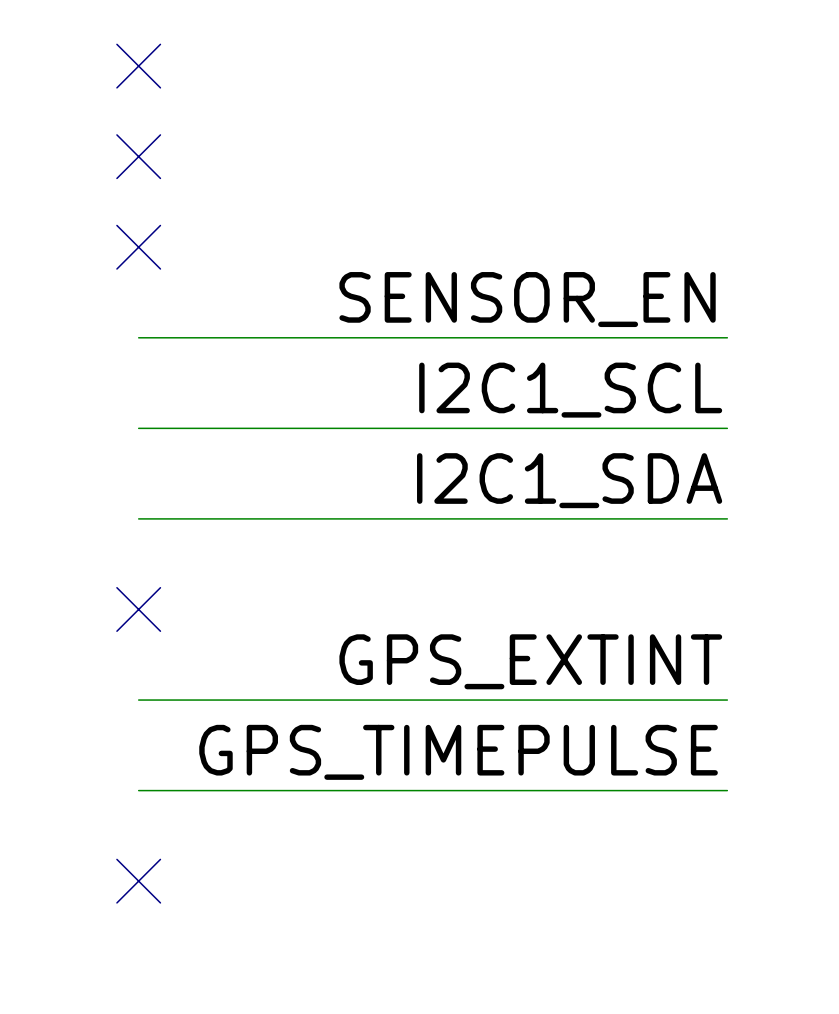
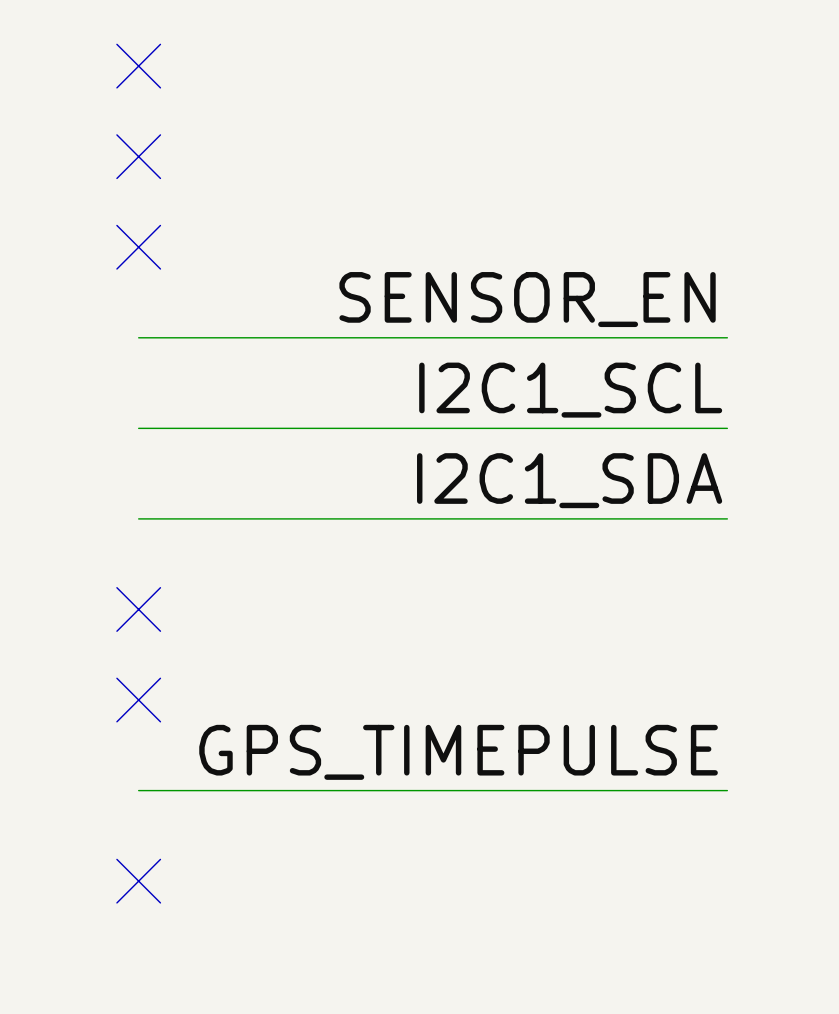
label: GPS_EXTINT (530, 661) -> none
wire: (138, 700) (727, 700) -> none
no-connect mark: none -> (138, 700)

